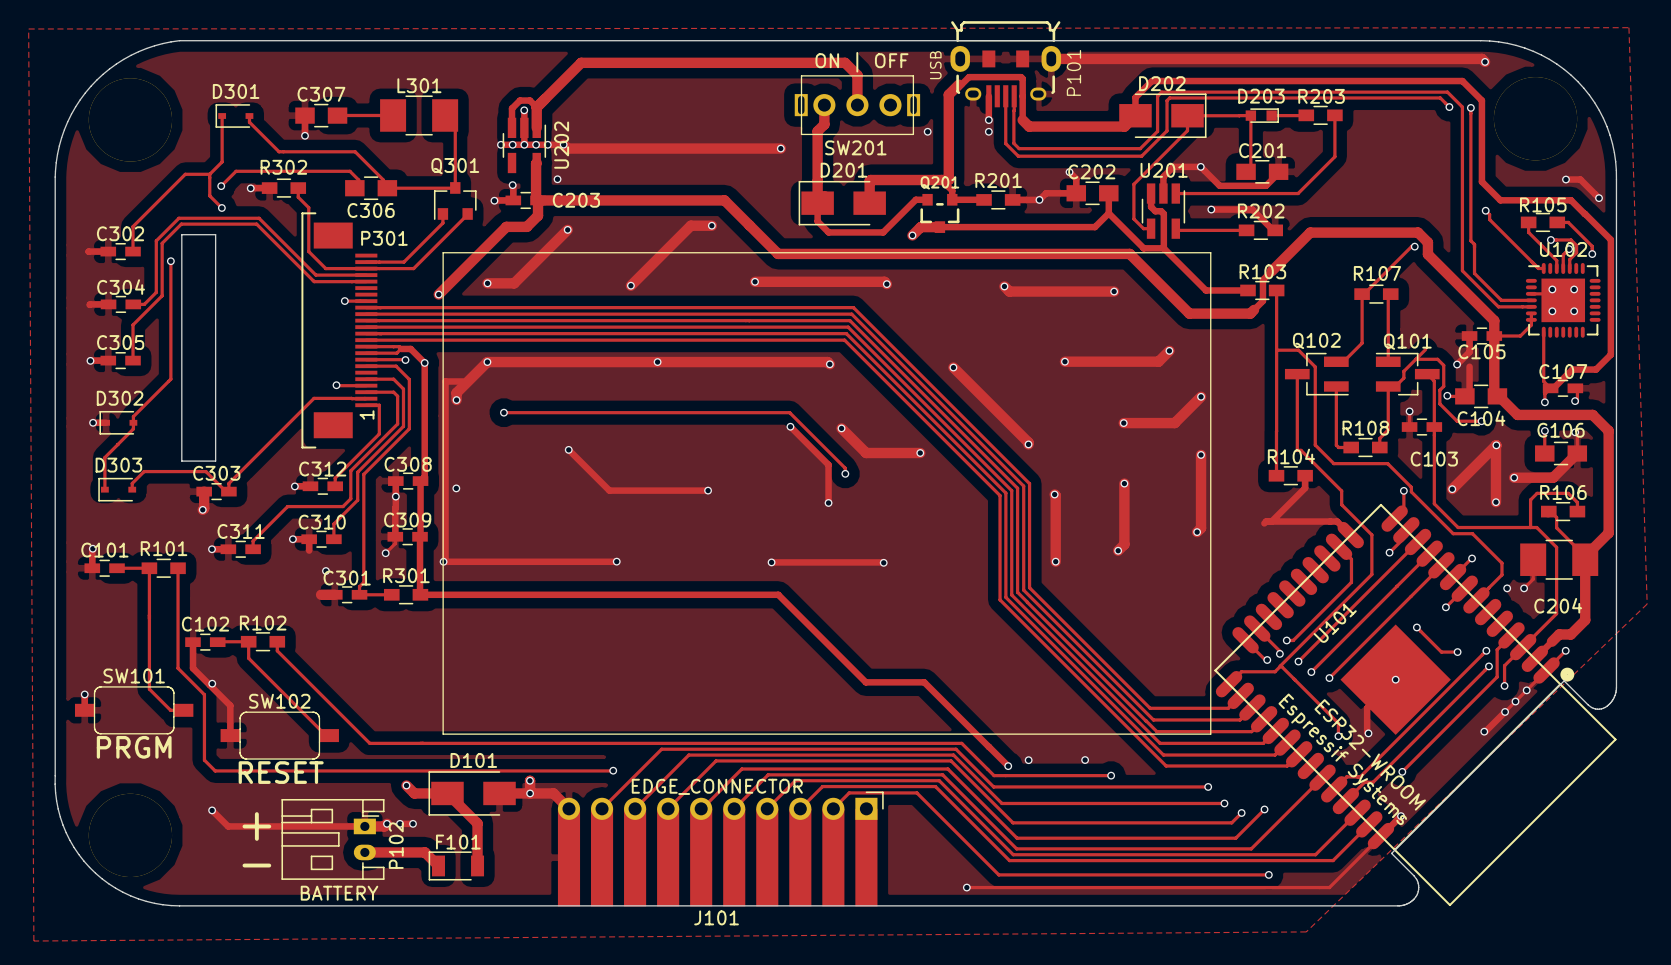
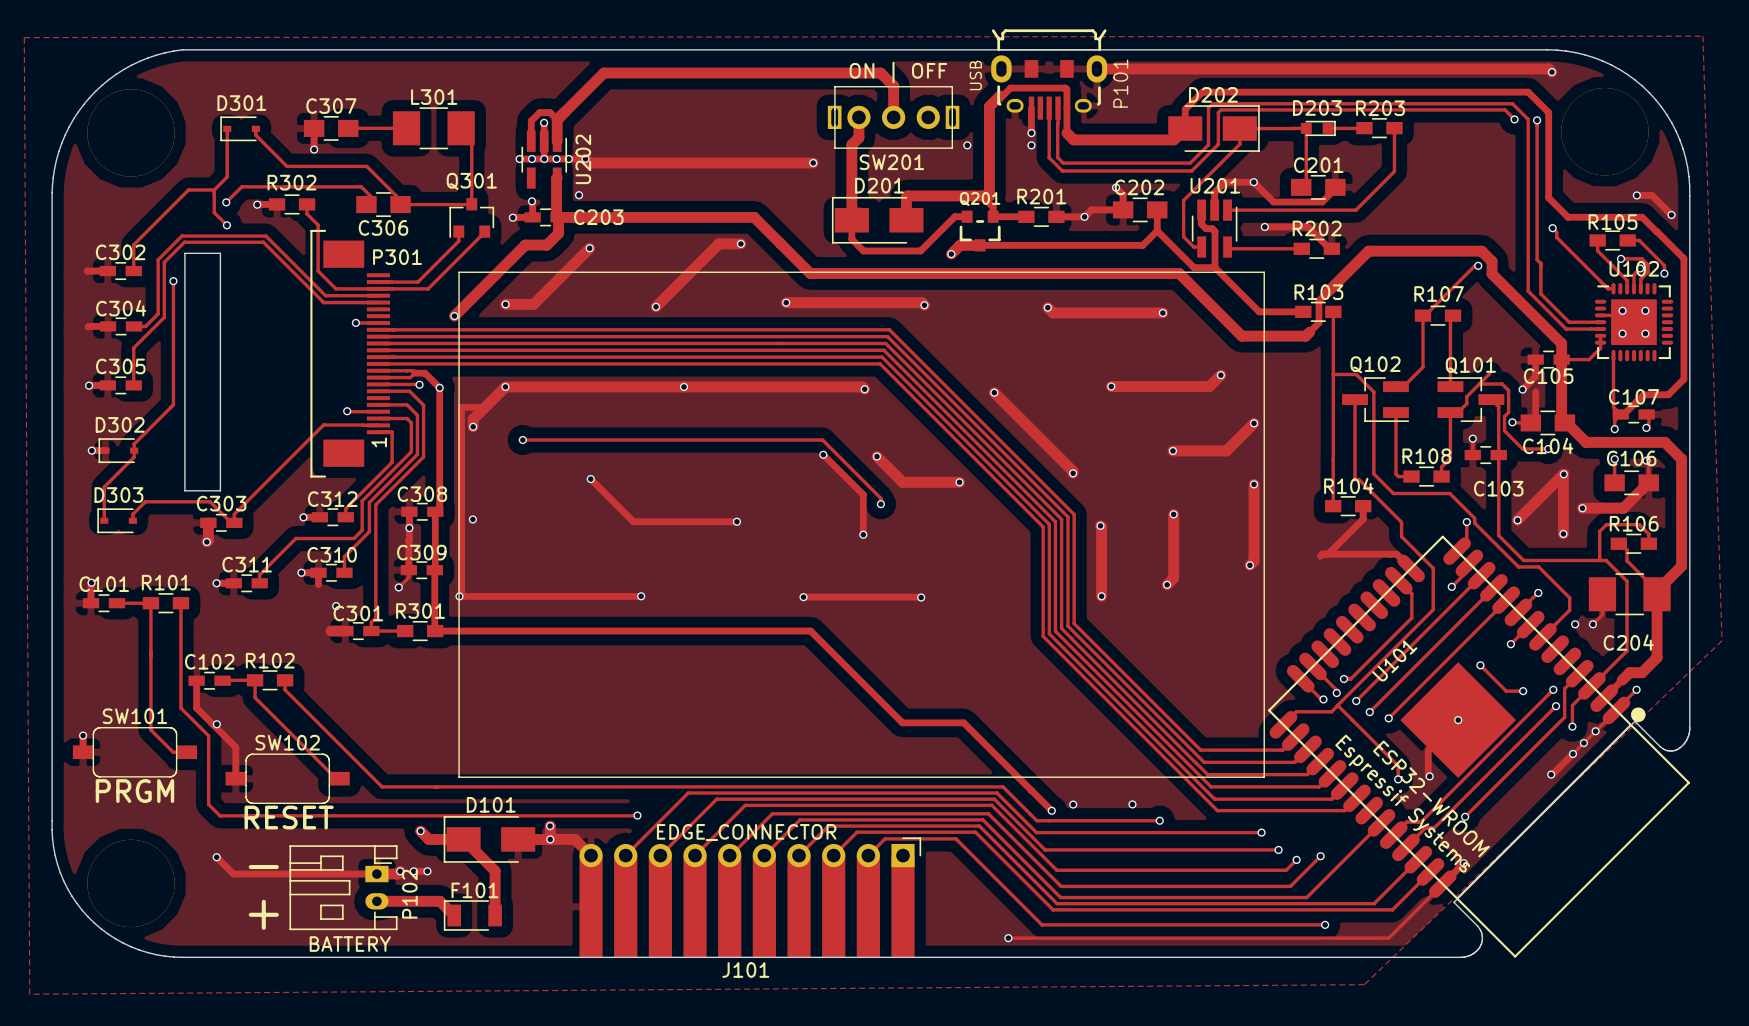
text: + (256, 826) -> - (263, 867)
text: - (256, 865) -> + (263, 914)

